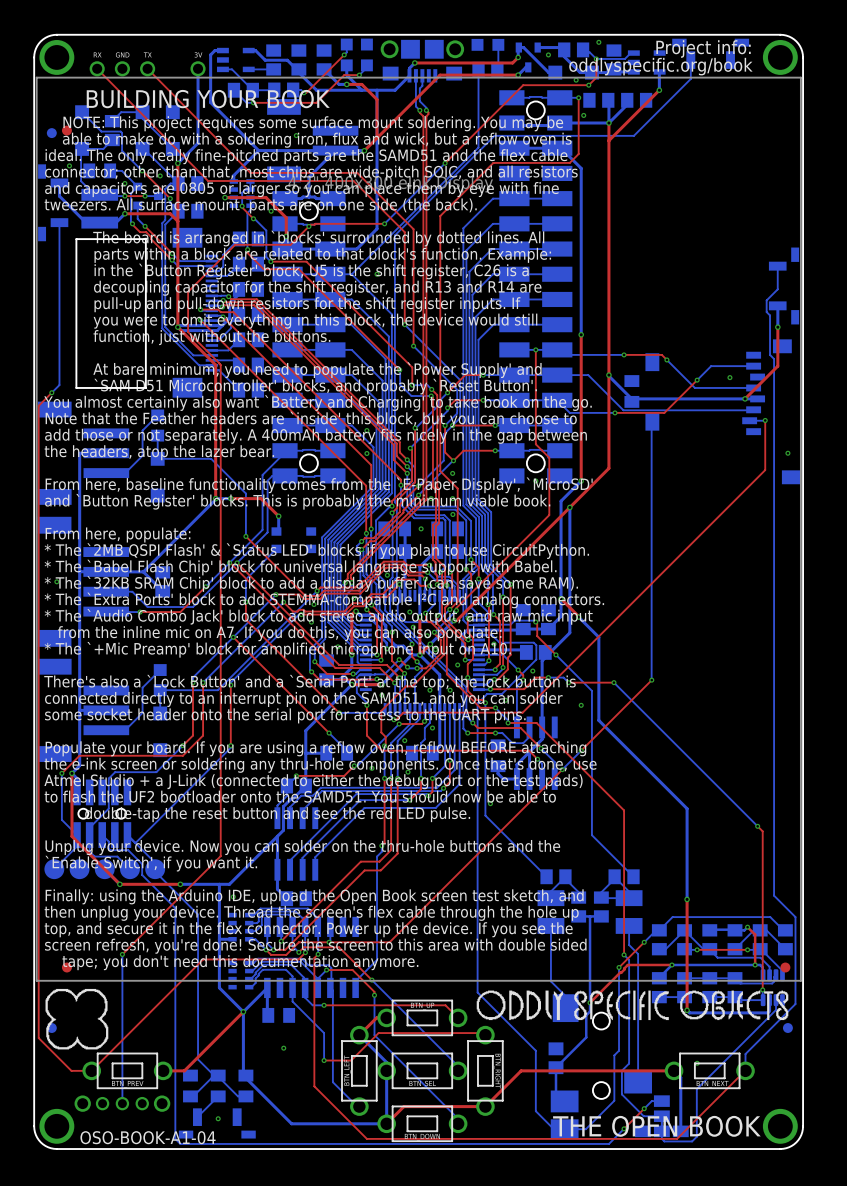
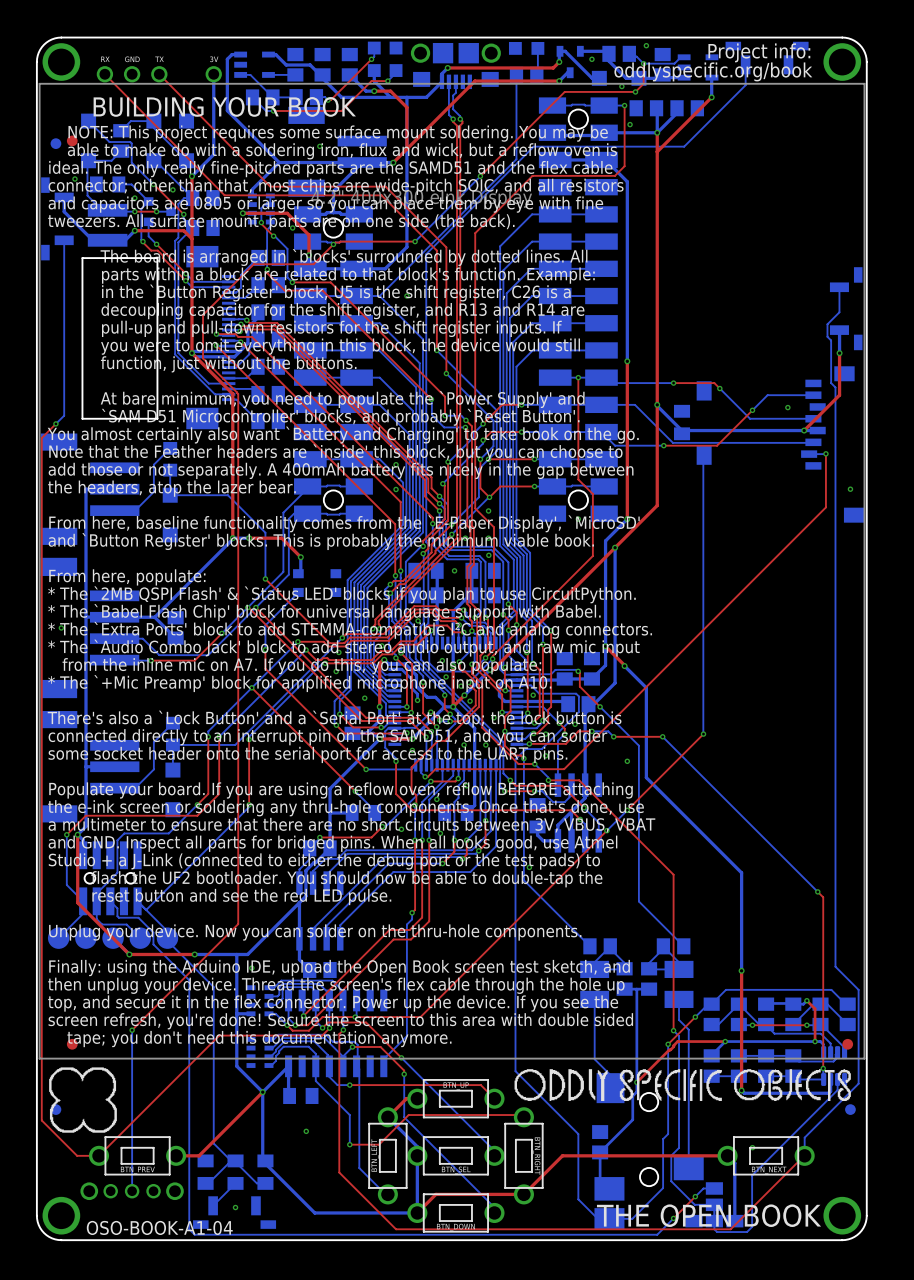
text: * The `32KB SRAM Chip' block to add a display buffer (can save some RAM). (311, 584) -> * The `Extra Ports' block to add STEMMA-compatible I²C and analog connectors. (350, 630)
text: * The `Extra Ports' block to add STEMMA-compatible I²C and analog connectors. (324, 600) -> * The `Audio Combo Jack' block to add stereo audio output, and raw mic input (343, 648)
text: * The `Audio Combo Jack' block to add stereo audio output, and raw mic input (318, 616) -> from the inline mic on A7. If you do this, you can also populate: (301, 666)
text: from the inline mic on A7. If you do this, you can also populate: (279, 633) -> * The `+Mic Preamp' block for amplified microphone input on A10. (299, 683)
text: * The `+Mic Preamp' block for amplified microphone input on A10. (277, 649) -> none
text: none -> There's also a `Lock Button' and a `Serial Port' at the top; the lock button is (334, 719)
text: There's also a `Lock Button' and a `Serial Port' at the top; the lock button is (309, 682) -> connected directly to an interrupt pin on the SAMD51, and you can solder (327, 737)
text: connected directly to an interrupt pin on the SAMD51, and you can solder (303, 699) -> some socket header onto the serial port for access to the UART pins. (307, 754)
text: some socket header onto the serial port for access to the UART pins. (285, 715) -> none
text: none -> Populate your board. If you are using a reflow oven, reflow BEFORE attaching (341, 790)
text: Populate your board. If you are using a reflow oven, reflow BEFORE attaching (315, 748) -> the e-ink screen or soldering any thru-hole components. Once that's done, use (346, 808)
text: the e-ink screen or soldering any thru-hole components. Once that's done, use (320, 765) -> a multimeter to ensure that there are no short circuits between 3V, VBUS, VBAT (351, 825)
text: Atmel Studio + a J-Link (connected to either the debug port or the test pads) (313, 781) -> and GND. Inspect all parts for bridged pins. When all looks good, use Atmel (333, 843)
text: to flash the UF2 bootloader onto the SAMD51. You should now be able to (300, 796) -> Studio + a J-Link (connected to either the debug port or the test pads) to (324, 861)
text: double-tap the reset button and see the red LED pulse. (277, 814) -> flash the UF2 bootloader. You should now be able to double-tap the (346, 879)
text: none -> reset button and see the red LED pulse. (241, 897)
text: Unplug your device. Now you can solder on the thru-hole buttons and the (302, 847) -> none
text: `Enable Switch', if you want it. (151, 863) -> Unplug your device. Now you can solder on the thru-hole components. (315, 932)

